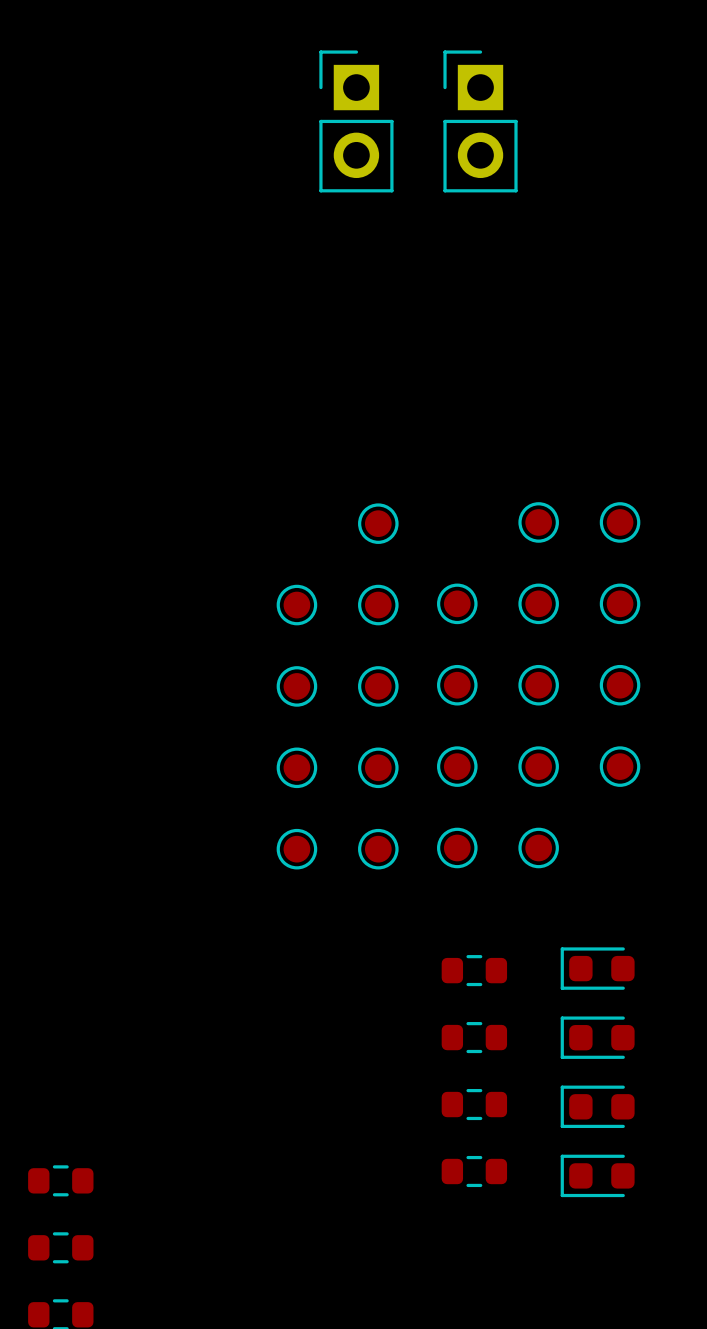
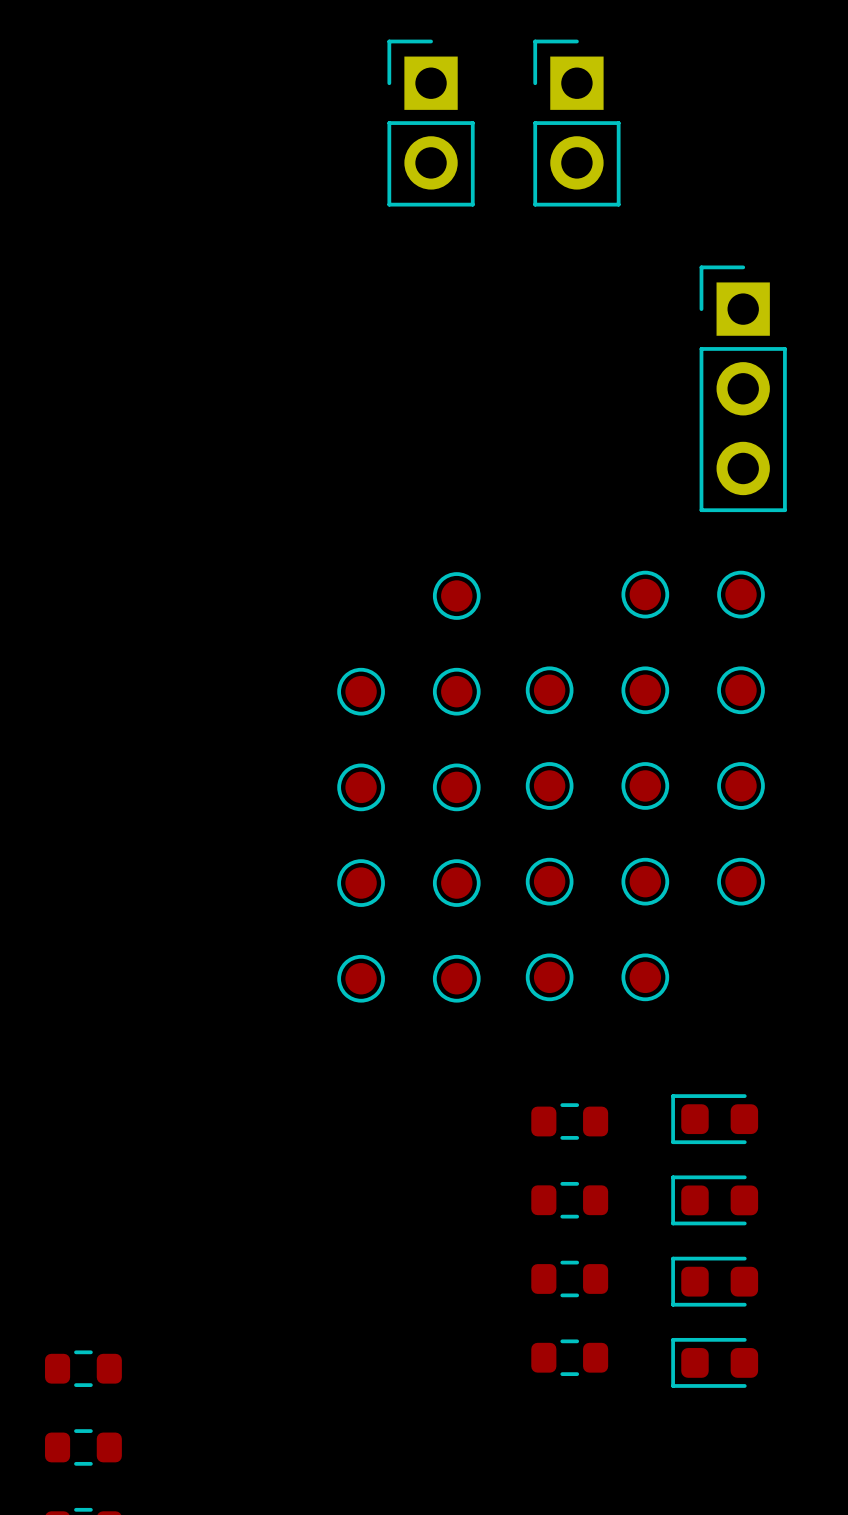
part: none -> (743, 388)

